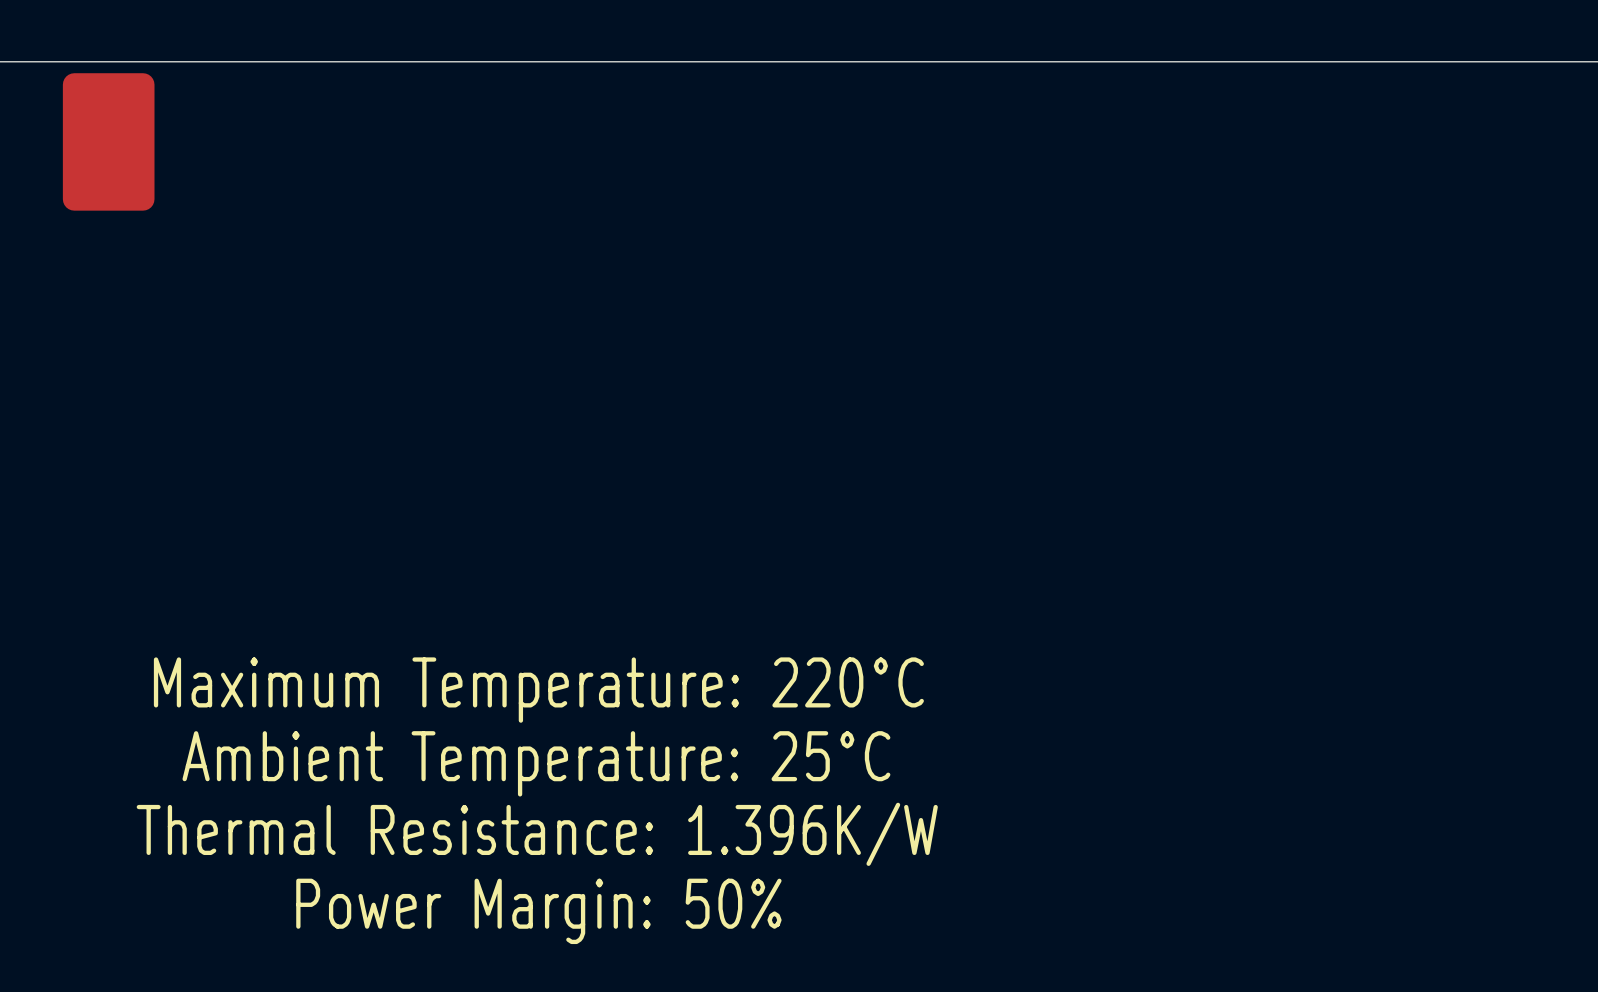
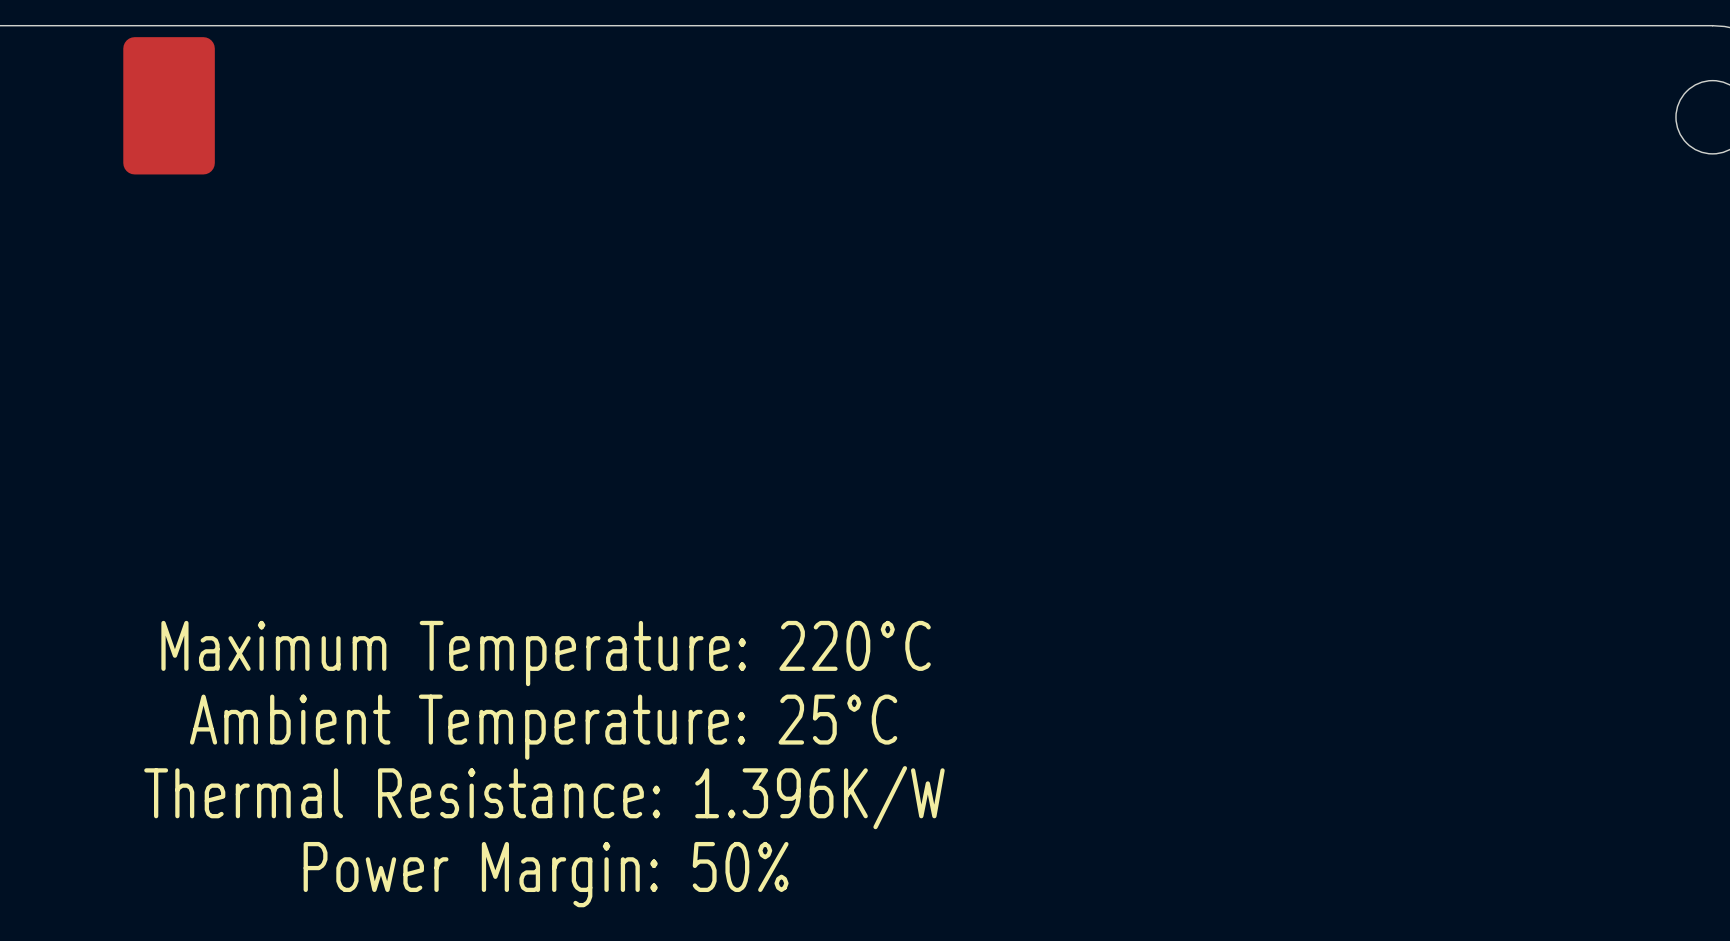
part position: (108, 141) -> (169, 105)

